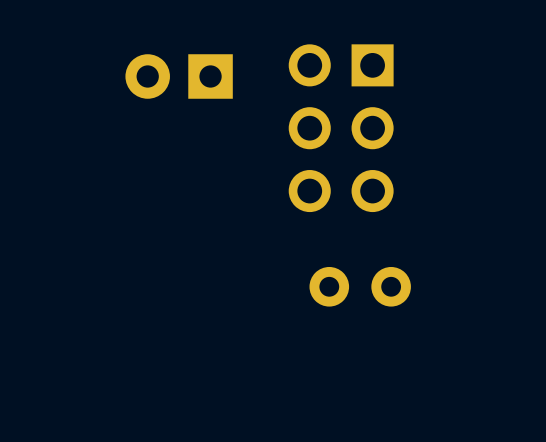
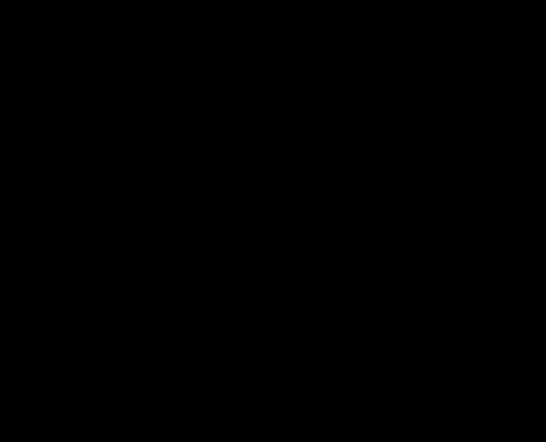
part: (179, 76) -> none
part: (341, 128) -> none
part: (360, 286) -> none

